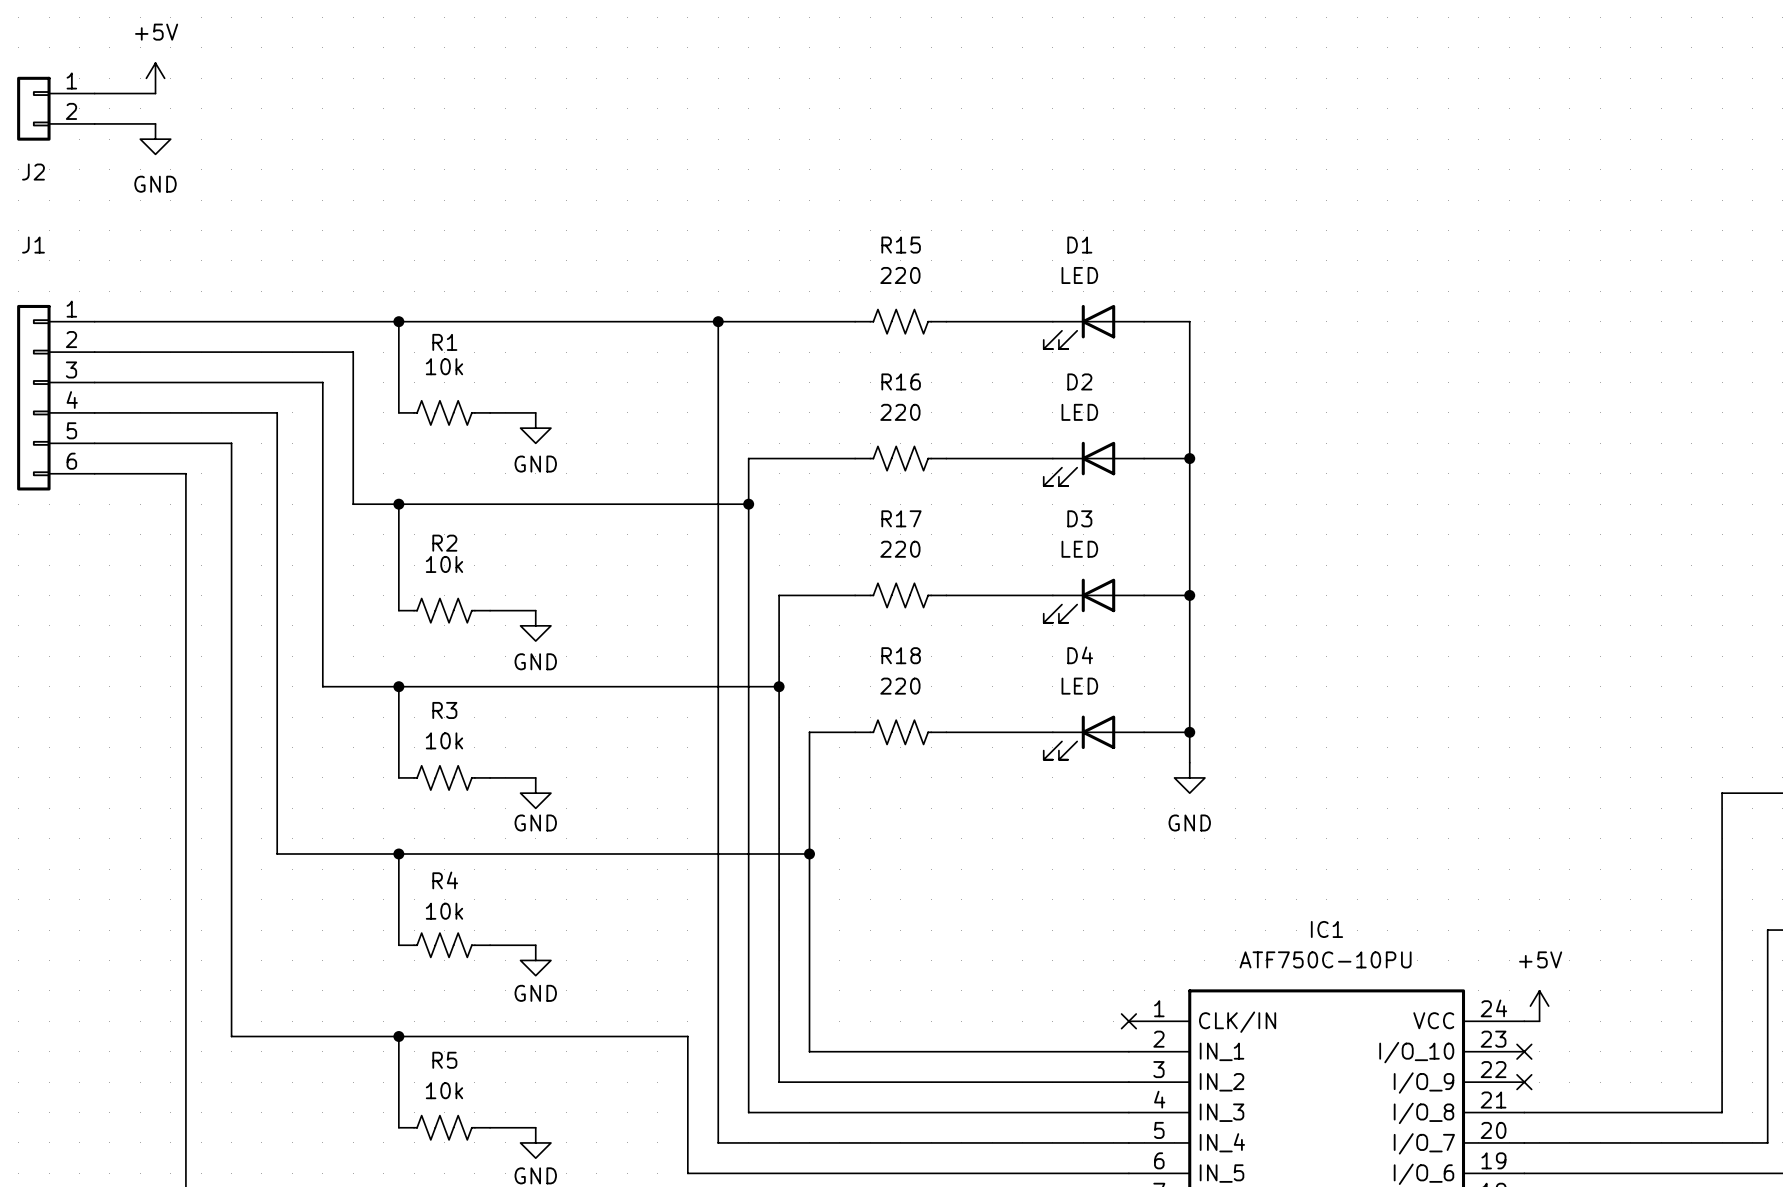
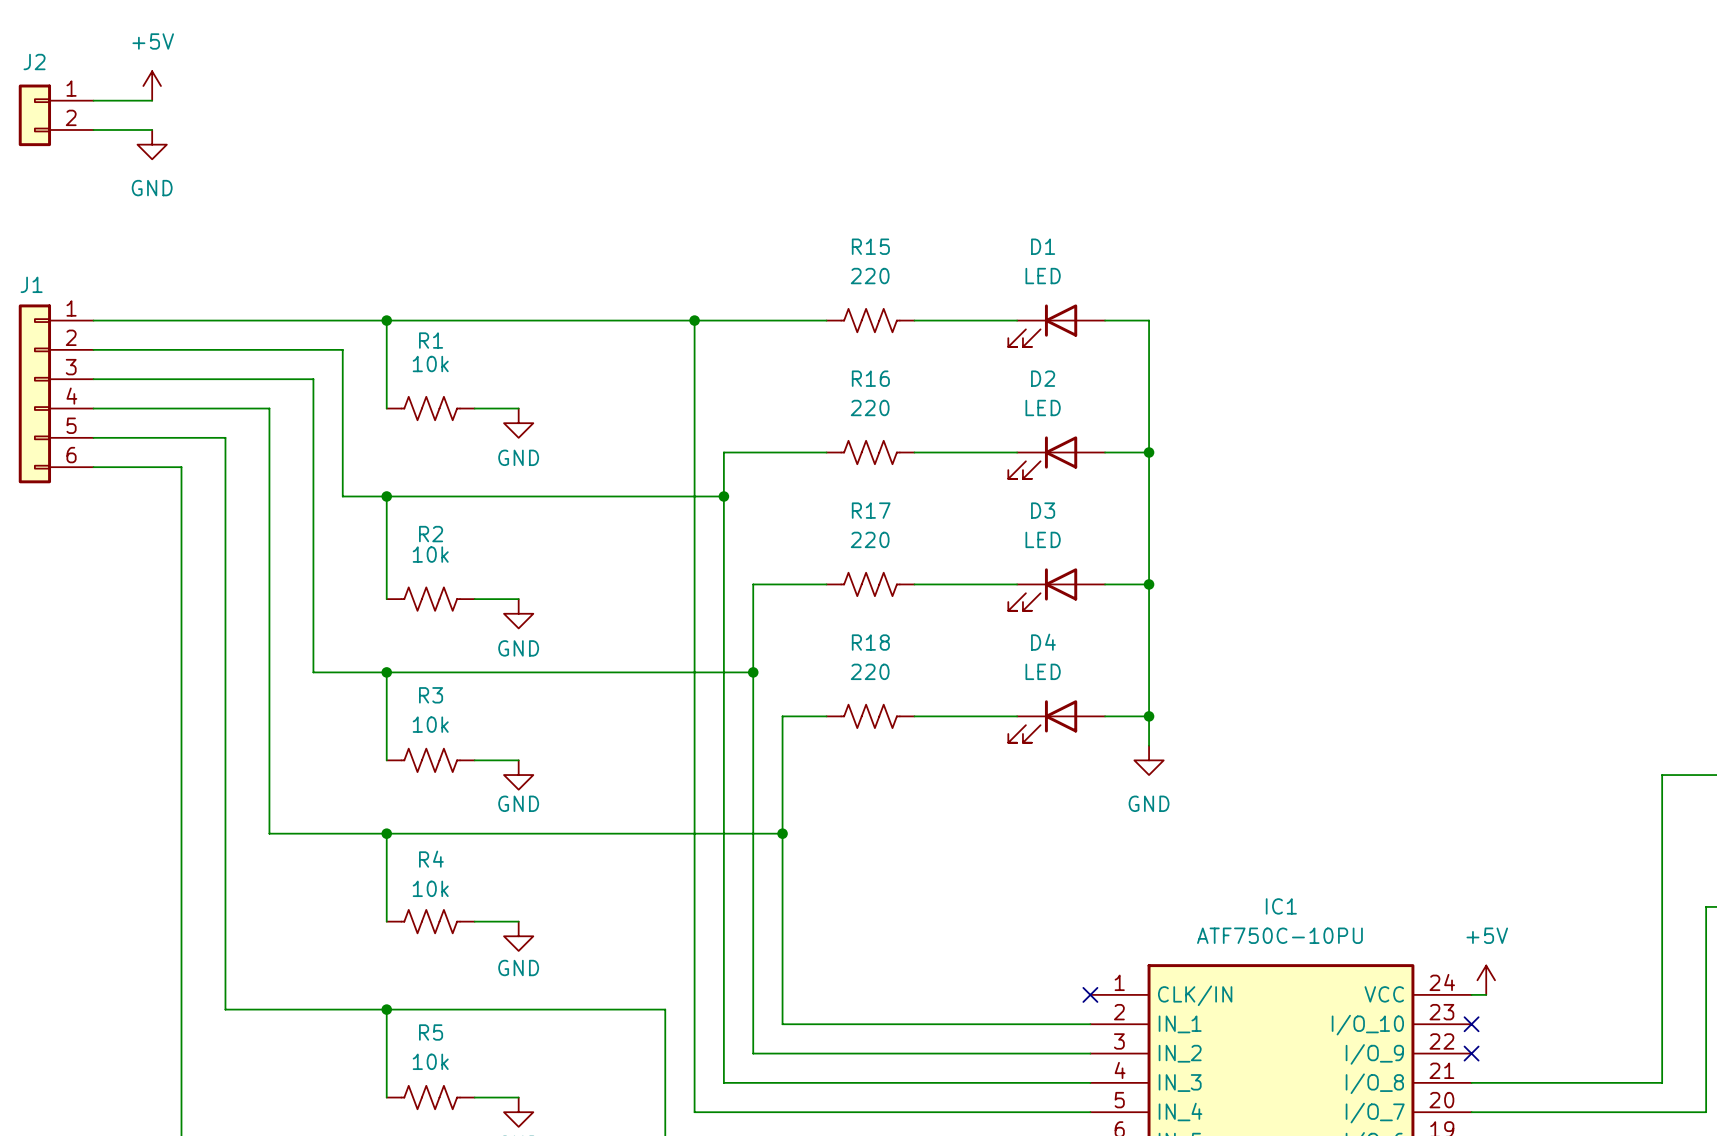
J2 name position: J2 (33, 172) -> J2 (34, 62)
J1 name position: J1 (33, 245) -> J1 (31, 284)

